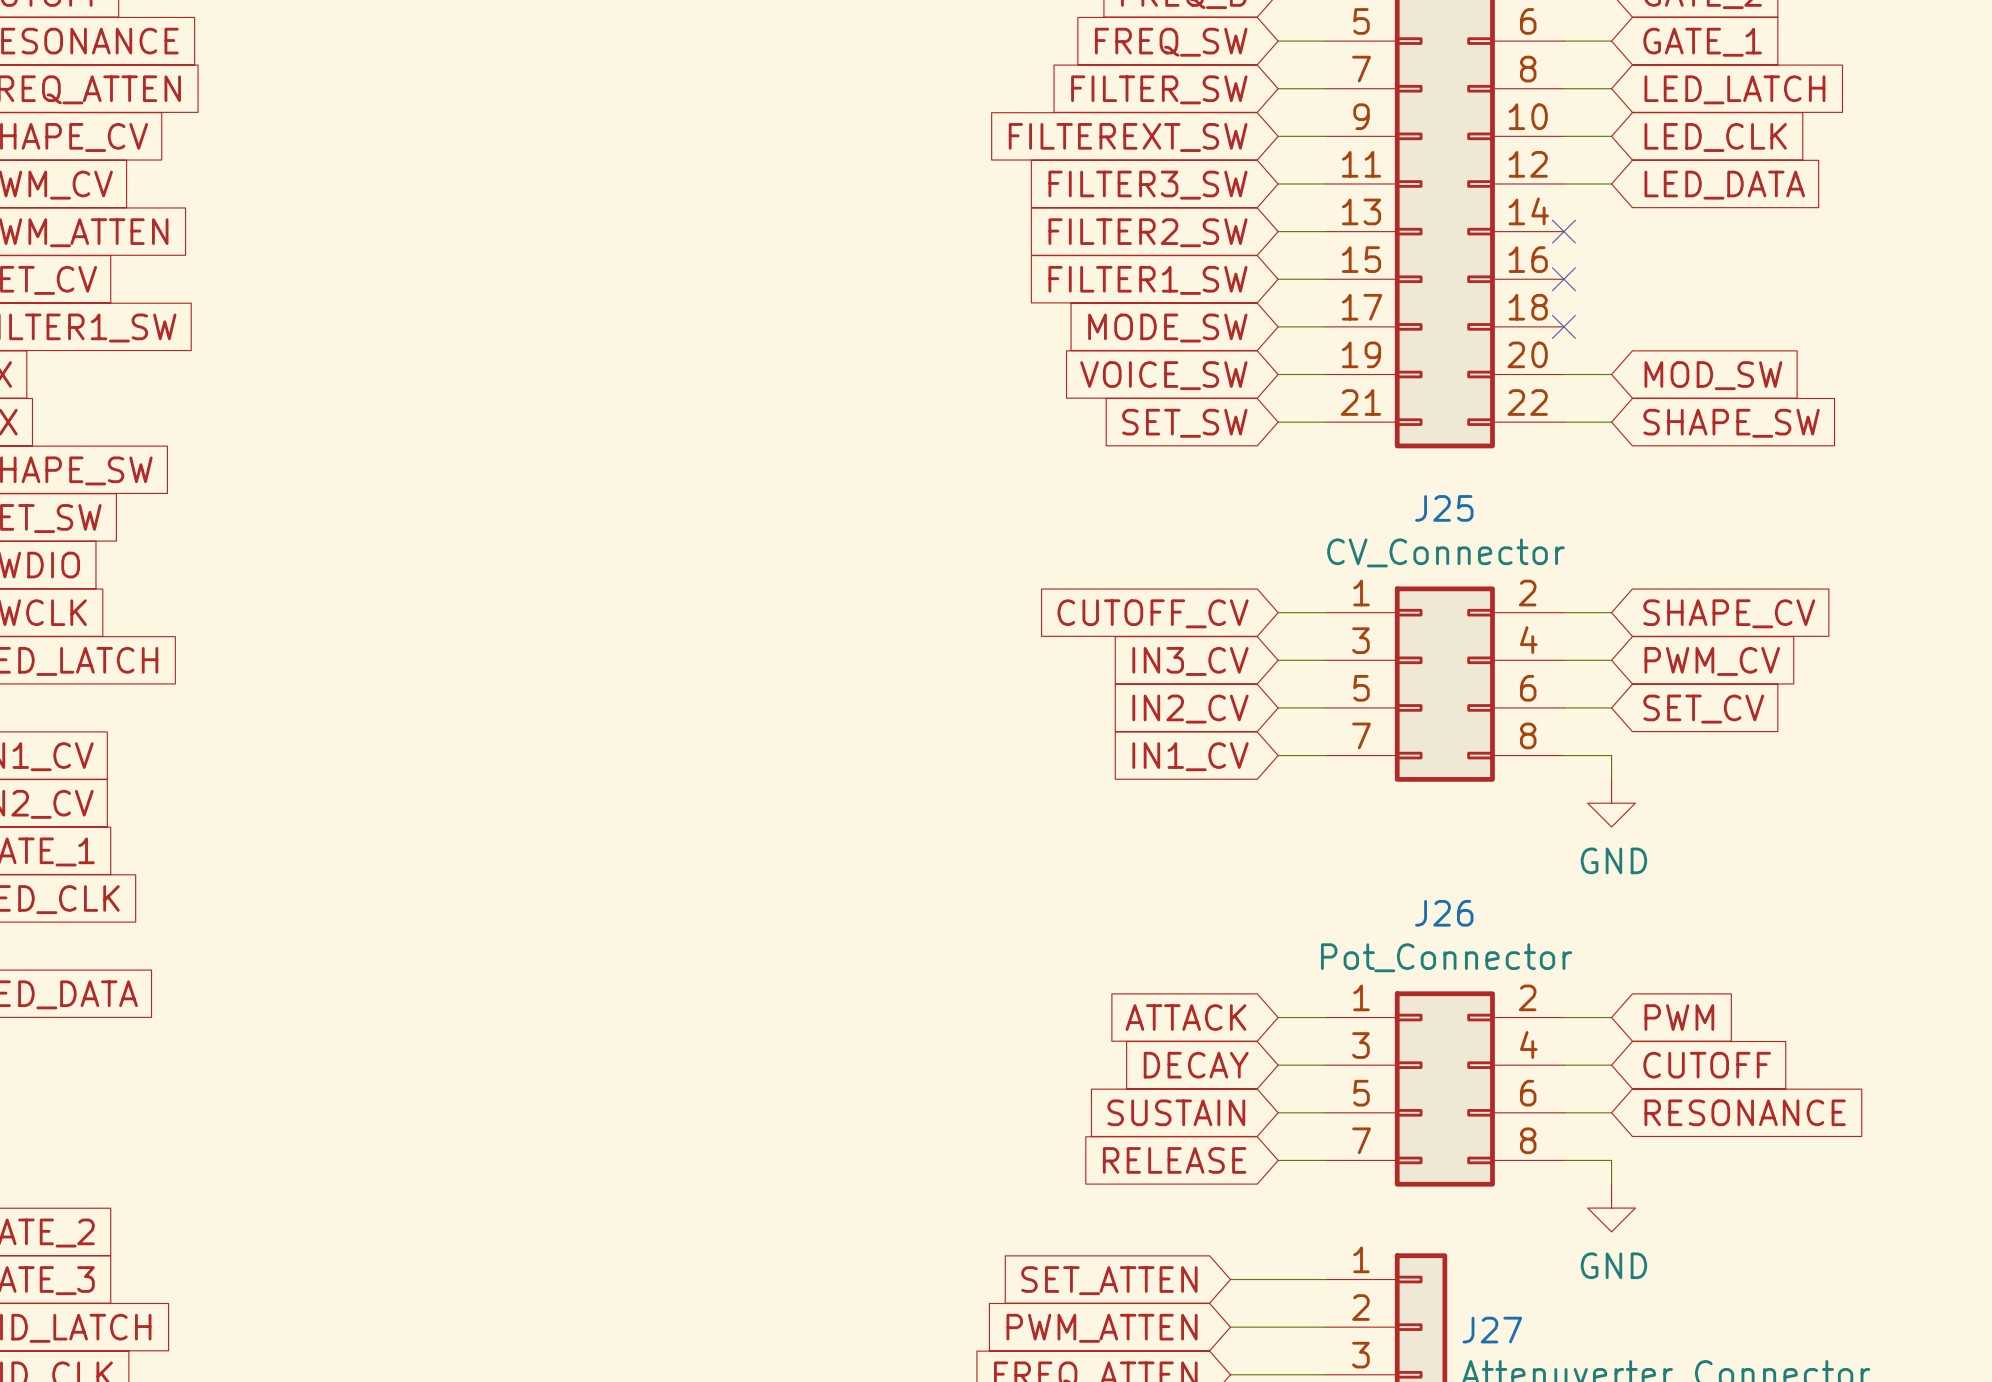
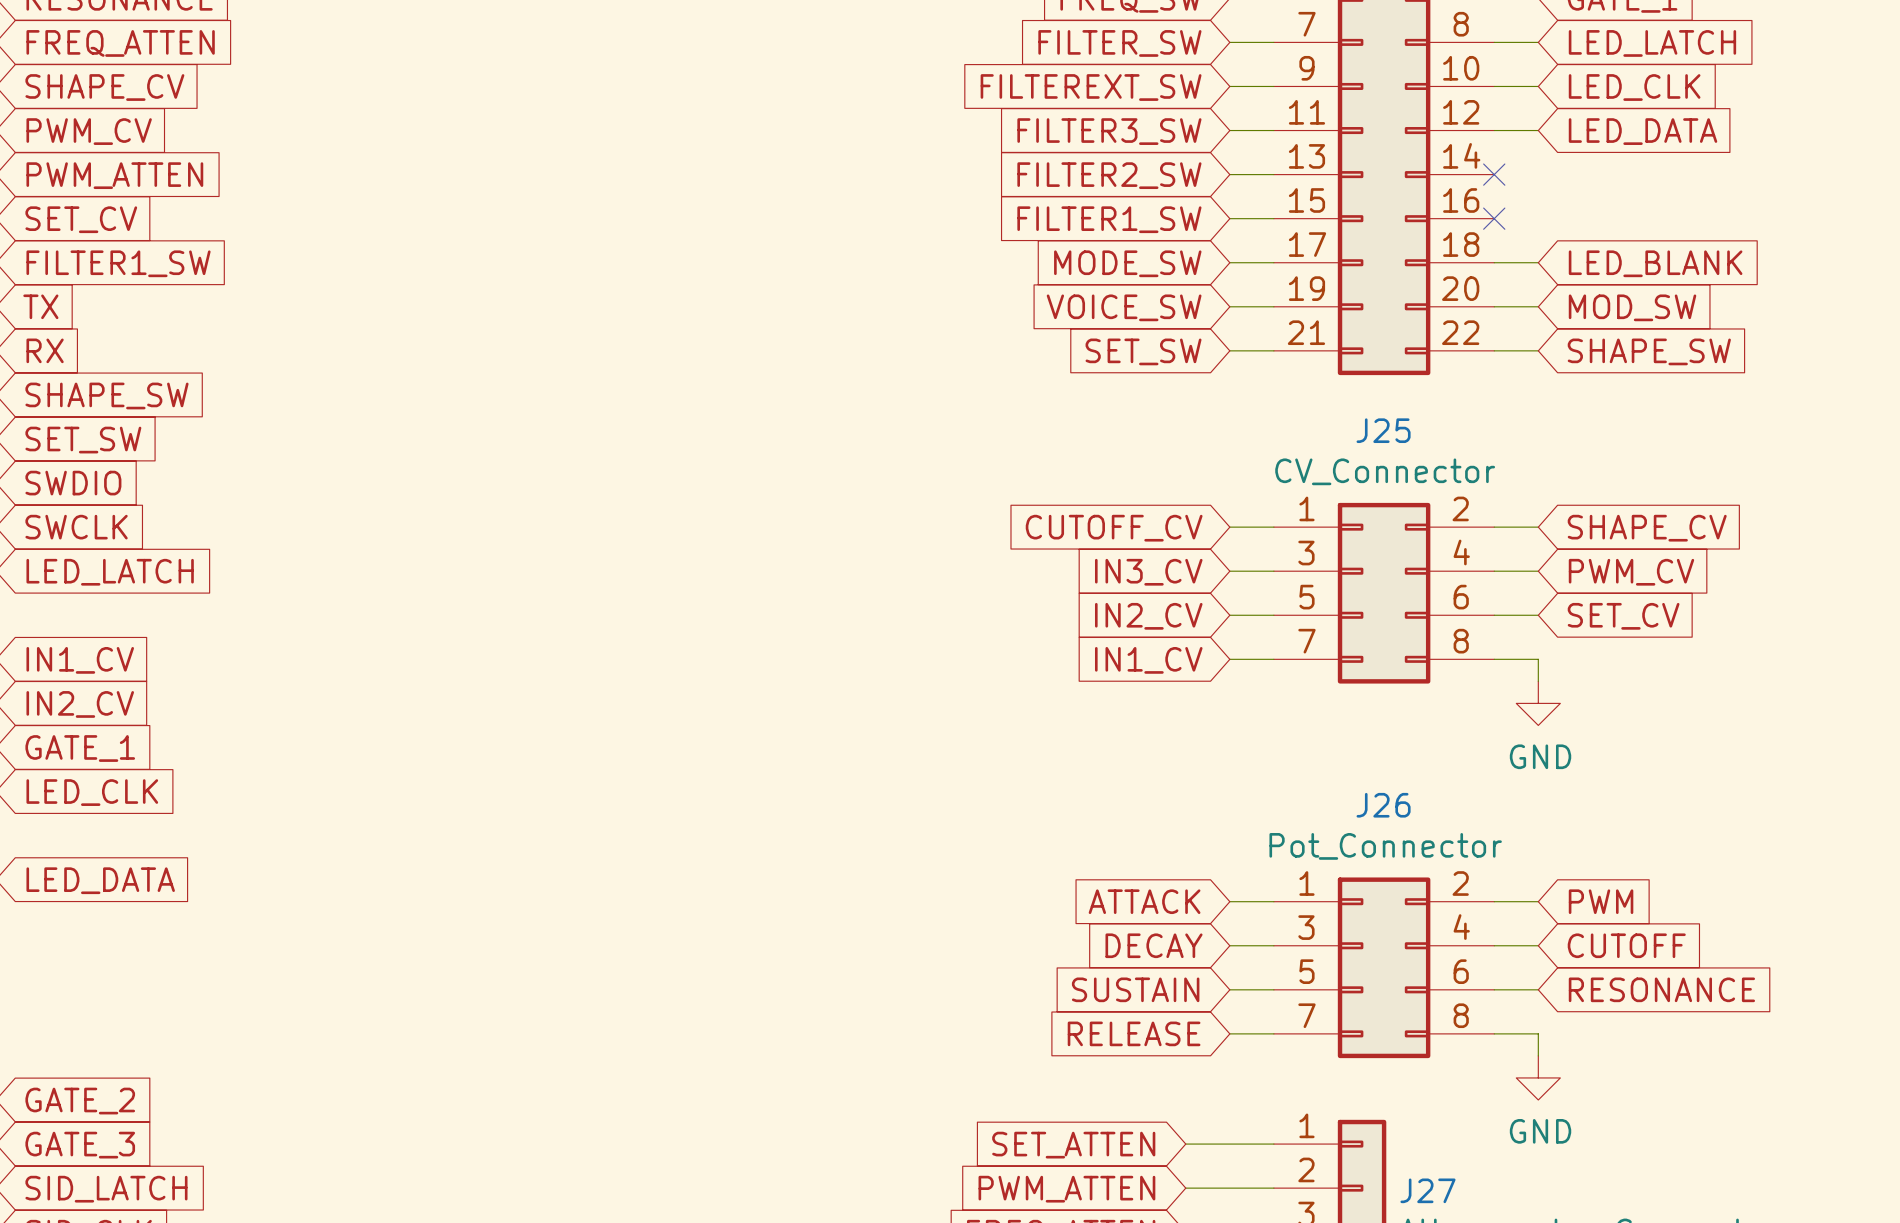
wire: none -> (1494, 262) (1538, 262)
no-connect mark: (1563, 326) -> none
global label: none -> LED_BLANK (1655, 263)

